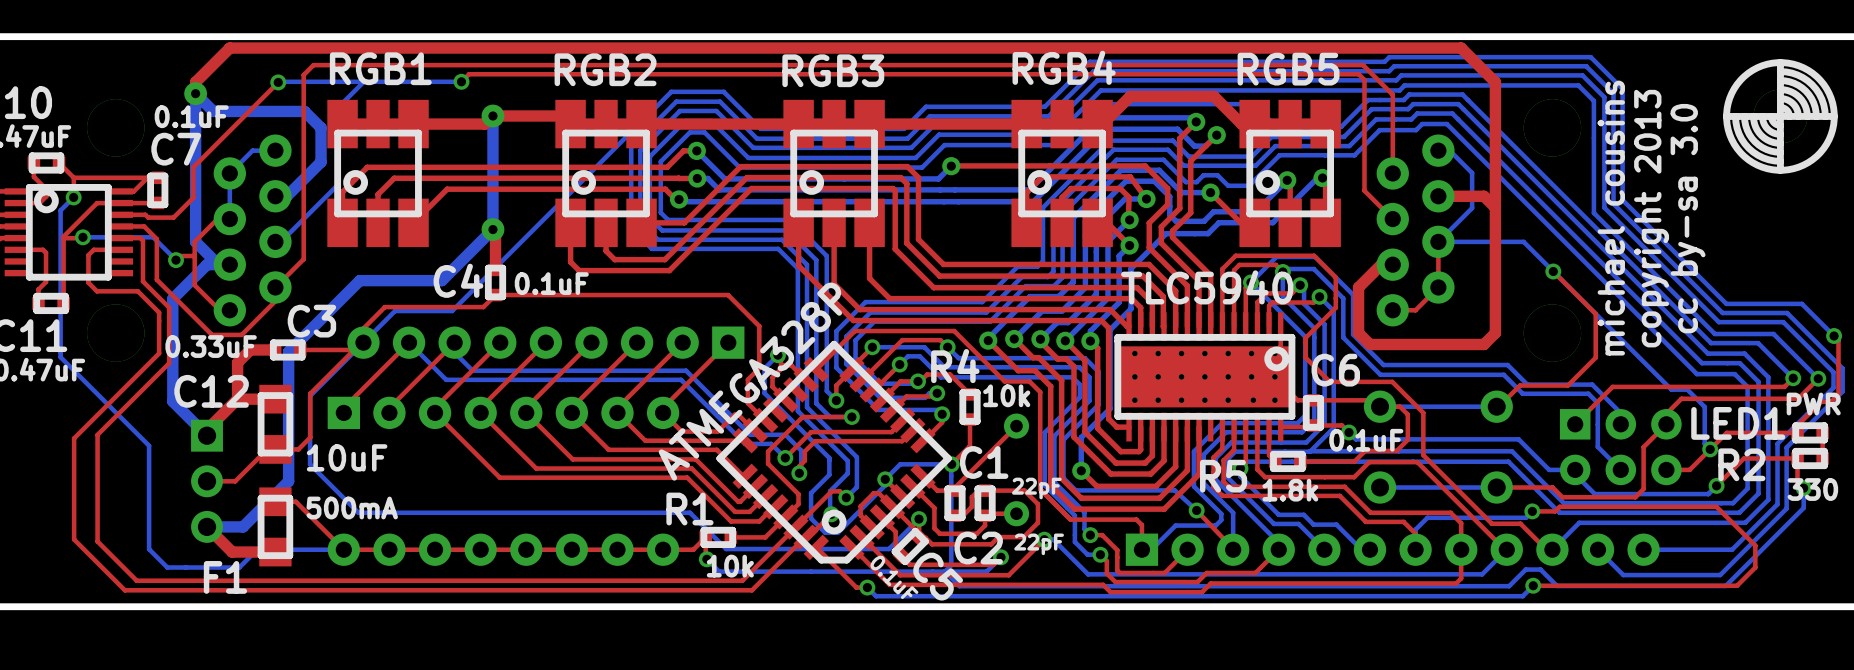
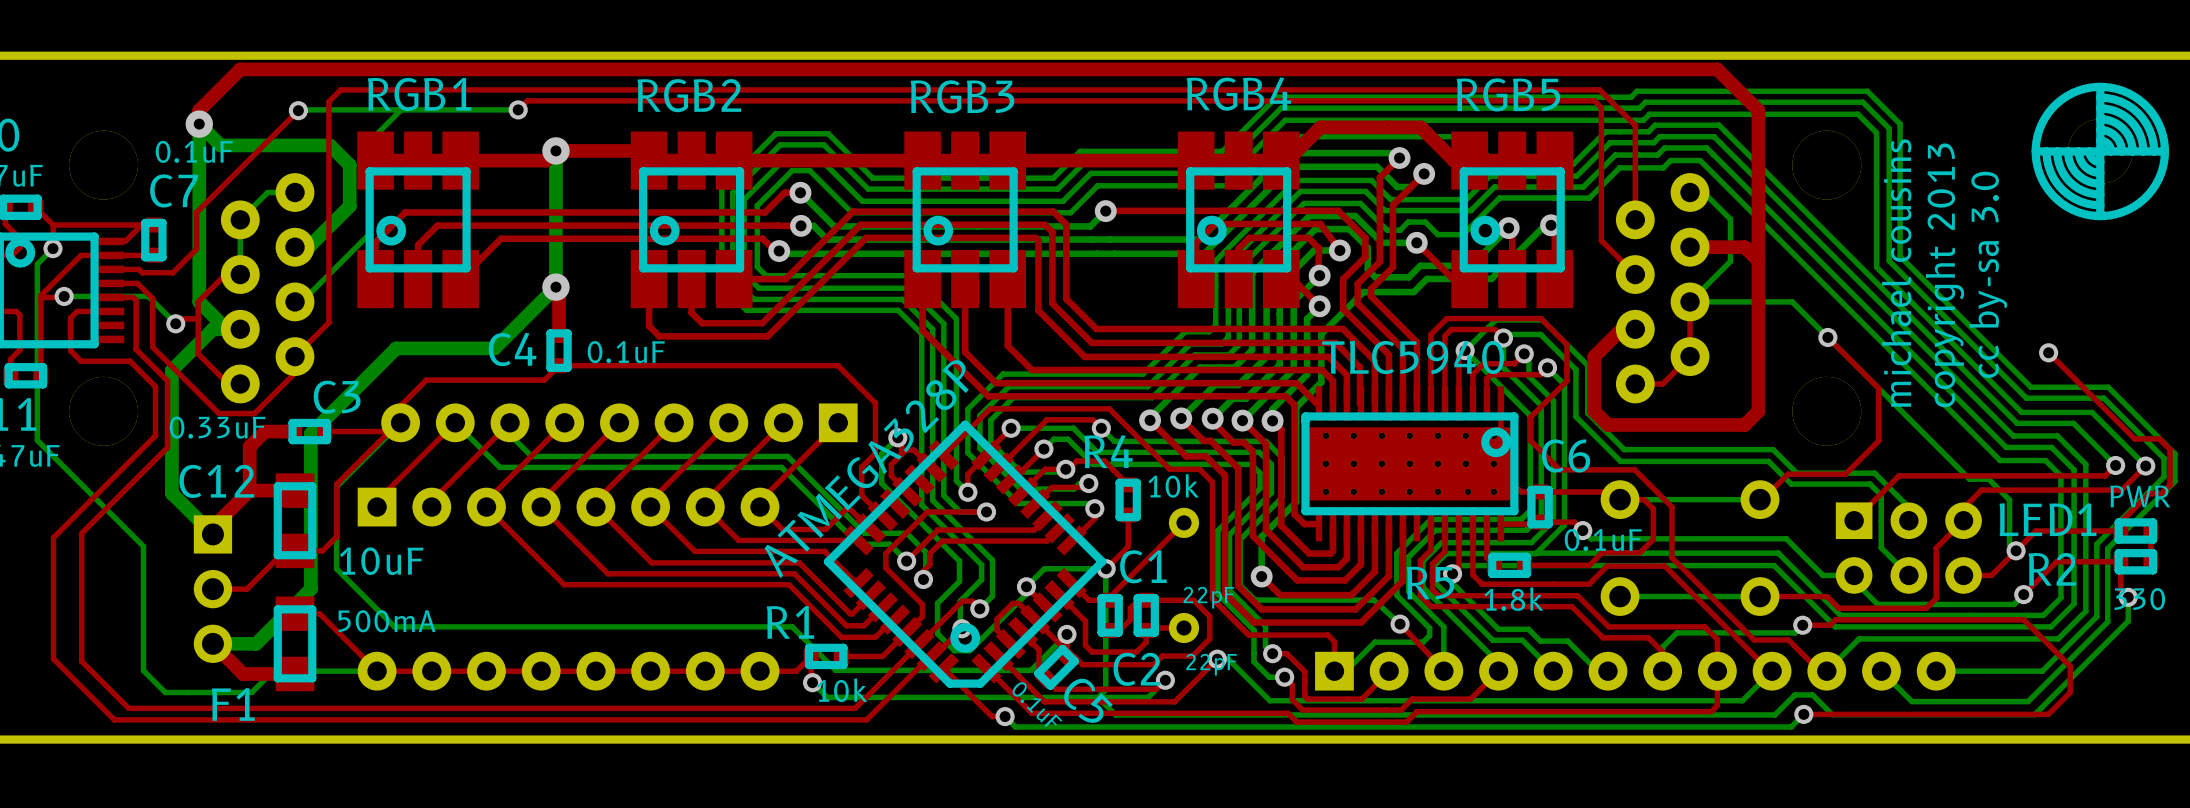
via: none -> (2048, 352)
top track: (1834, 336) (1838, 340) (1838, 364) -> (2048, 352) (2134, 438) (2159, 438) (2169, 449)
bottom track: (1834, 336) (1801, 303) (1726, 303) (1622, 200) (1622, 89) (1590, 57) (1389, 57) (1384, 61) (1089, 61) (1044, 106) (926, 106) (903, 128) (760, 128) (723, 91) (671, 91) (452, 311) (395, 311) (363, 342) -> none
via: (1834, 336) -> none

